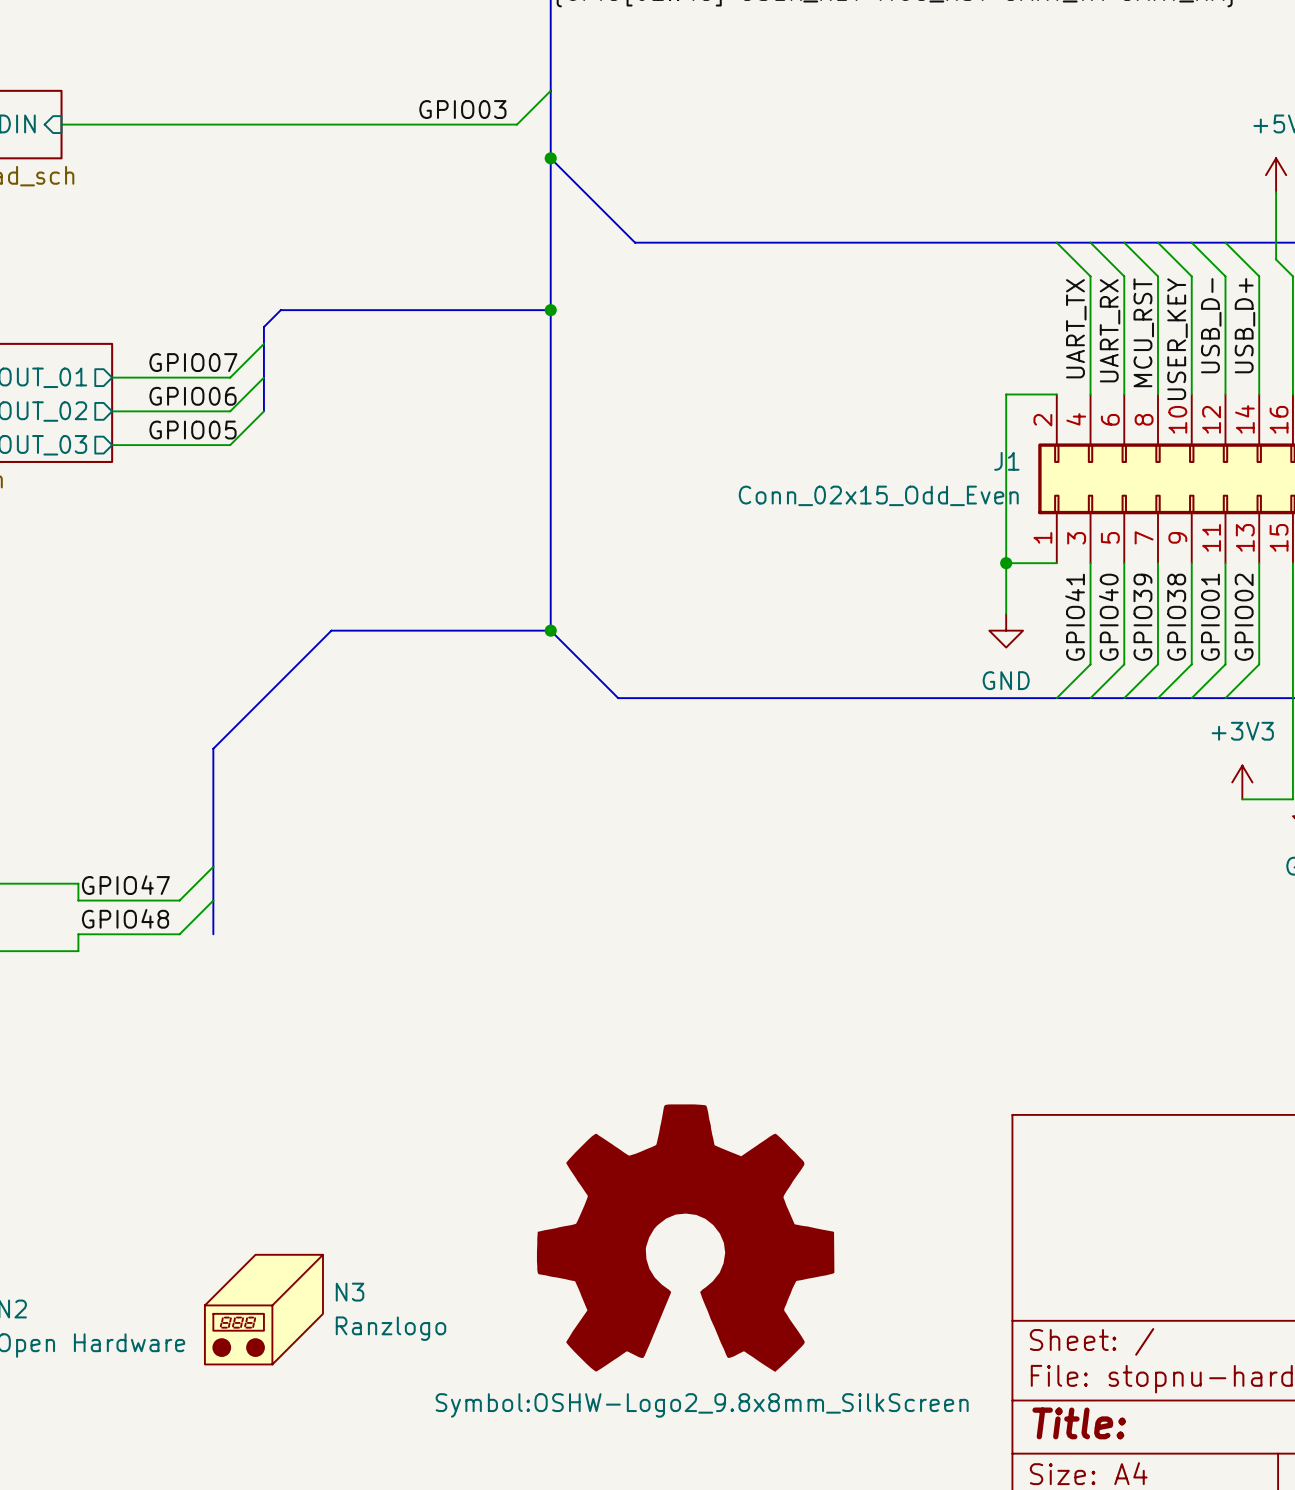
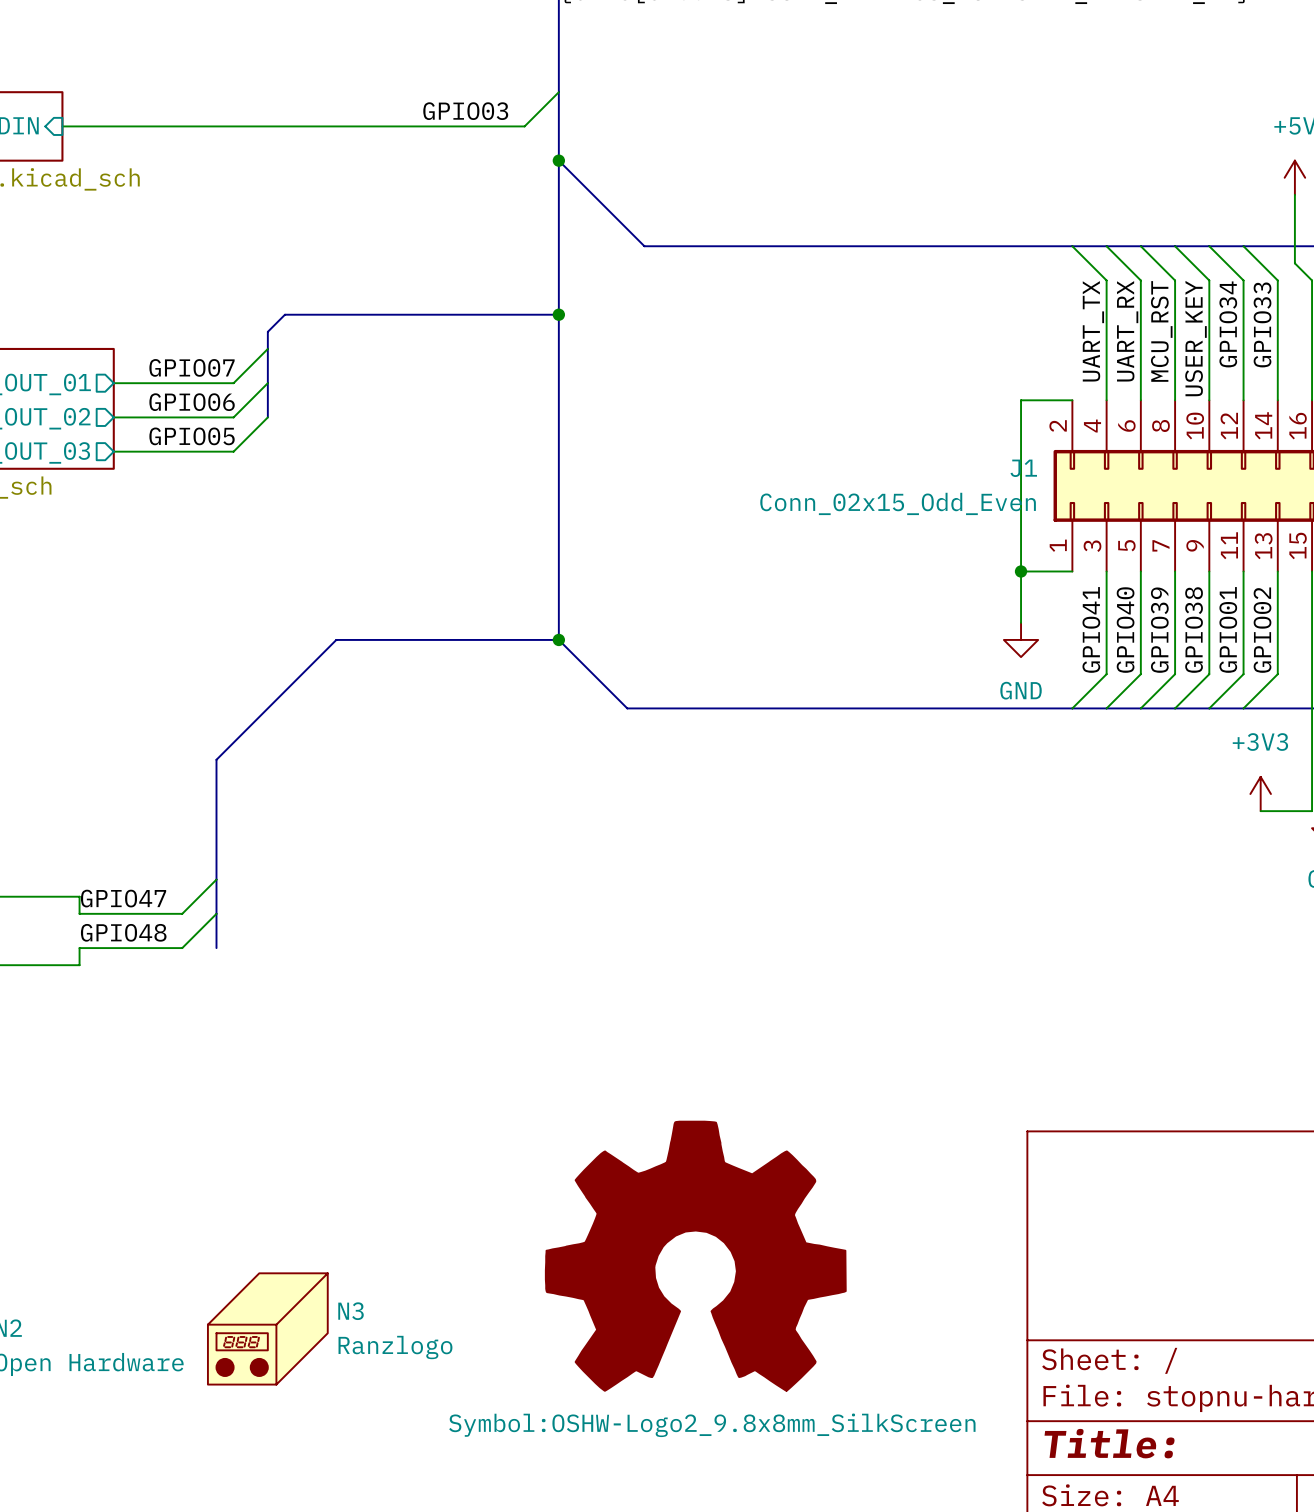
label: none -> GPIO34 (1228, 324)
label: none -> GPIO33 (1262, 324)
label: USB_D- (1211, 325) -> none
label: USB_D+ (1244, 325) -> none

